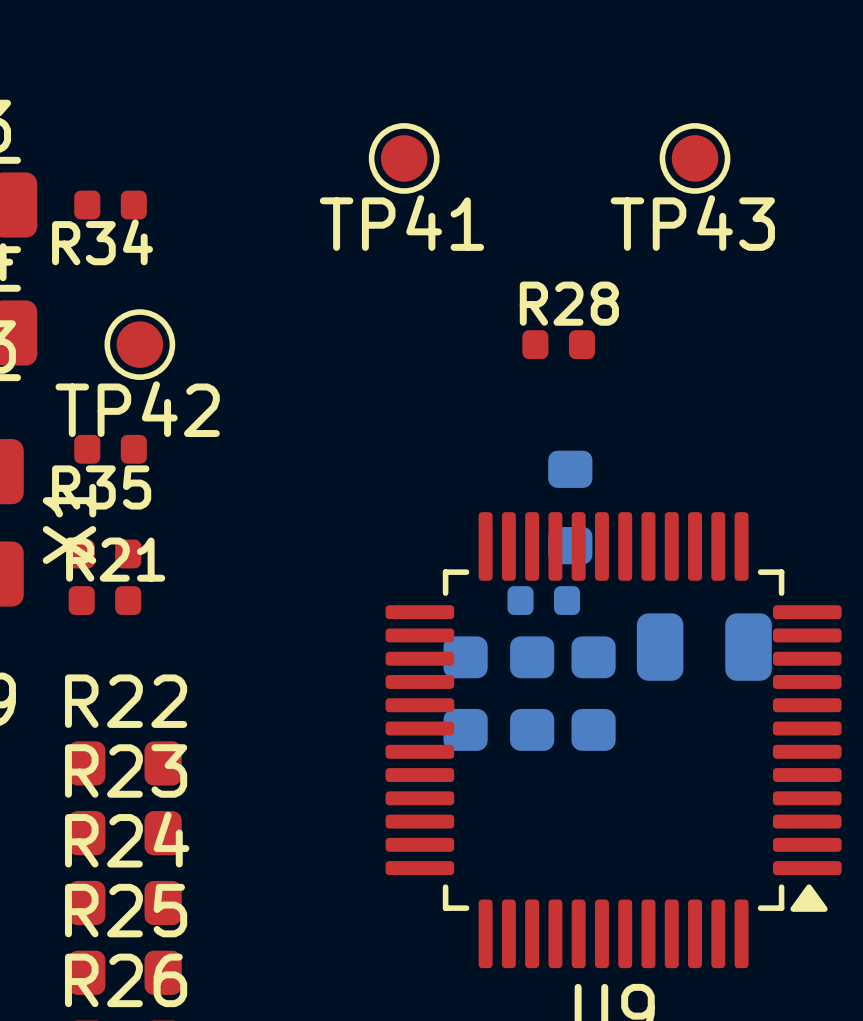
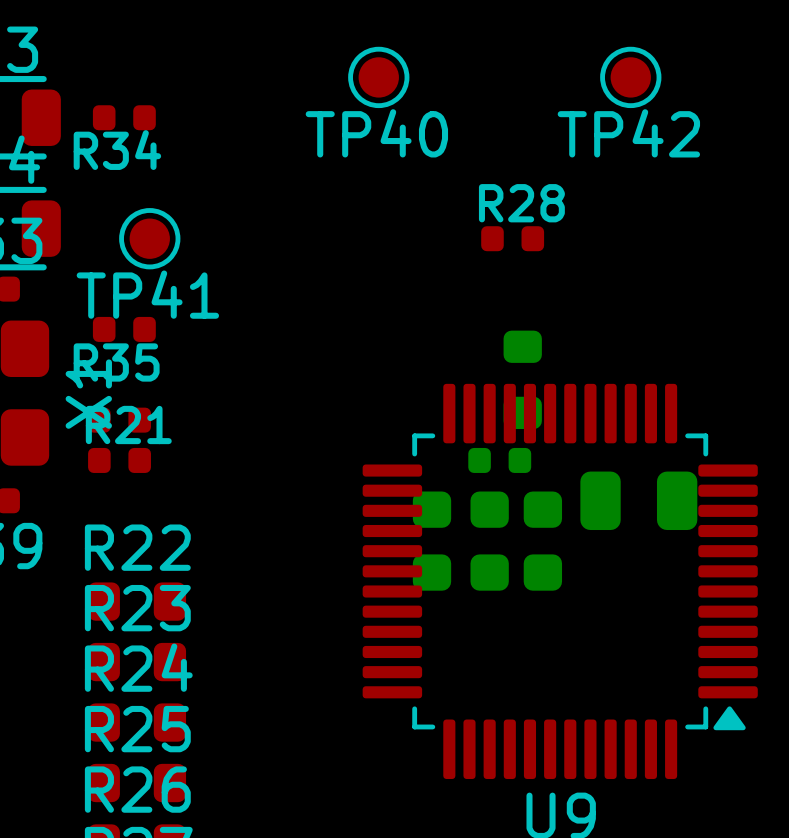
TP41 name: TP41 (401, 223) -> TP40 (376, 133)
TP43 name: TP43 (692, 223) -> TP42 (628, 133)
TP42 name: TP42 (137, 409) -> TP41 (147, 294)

